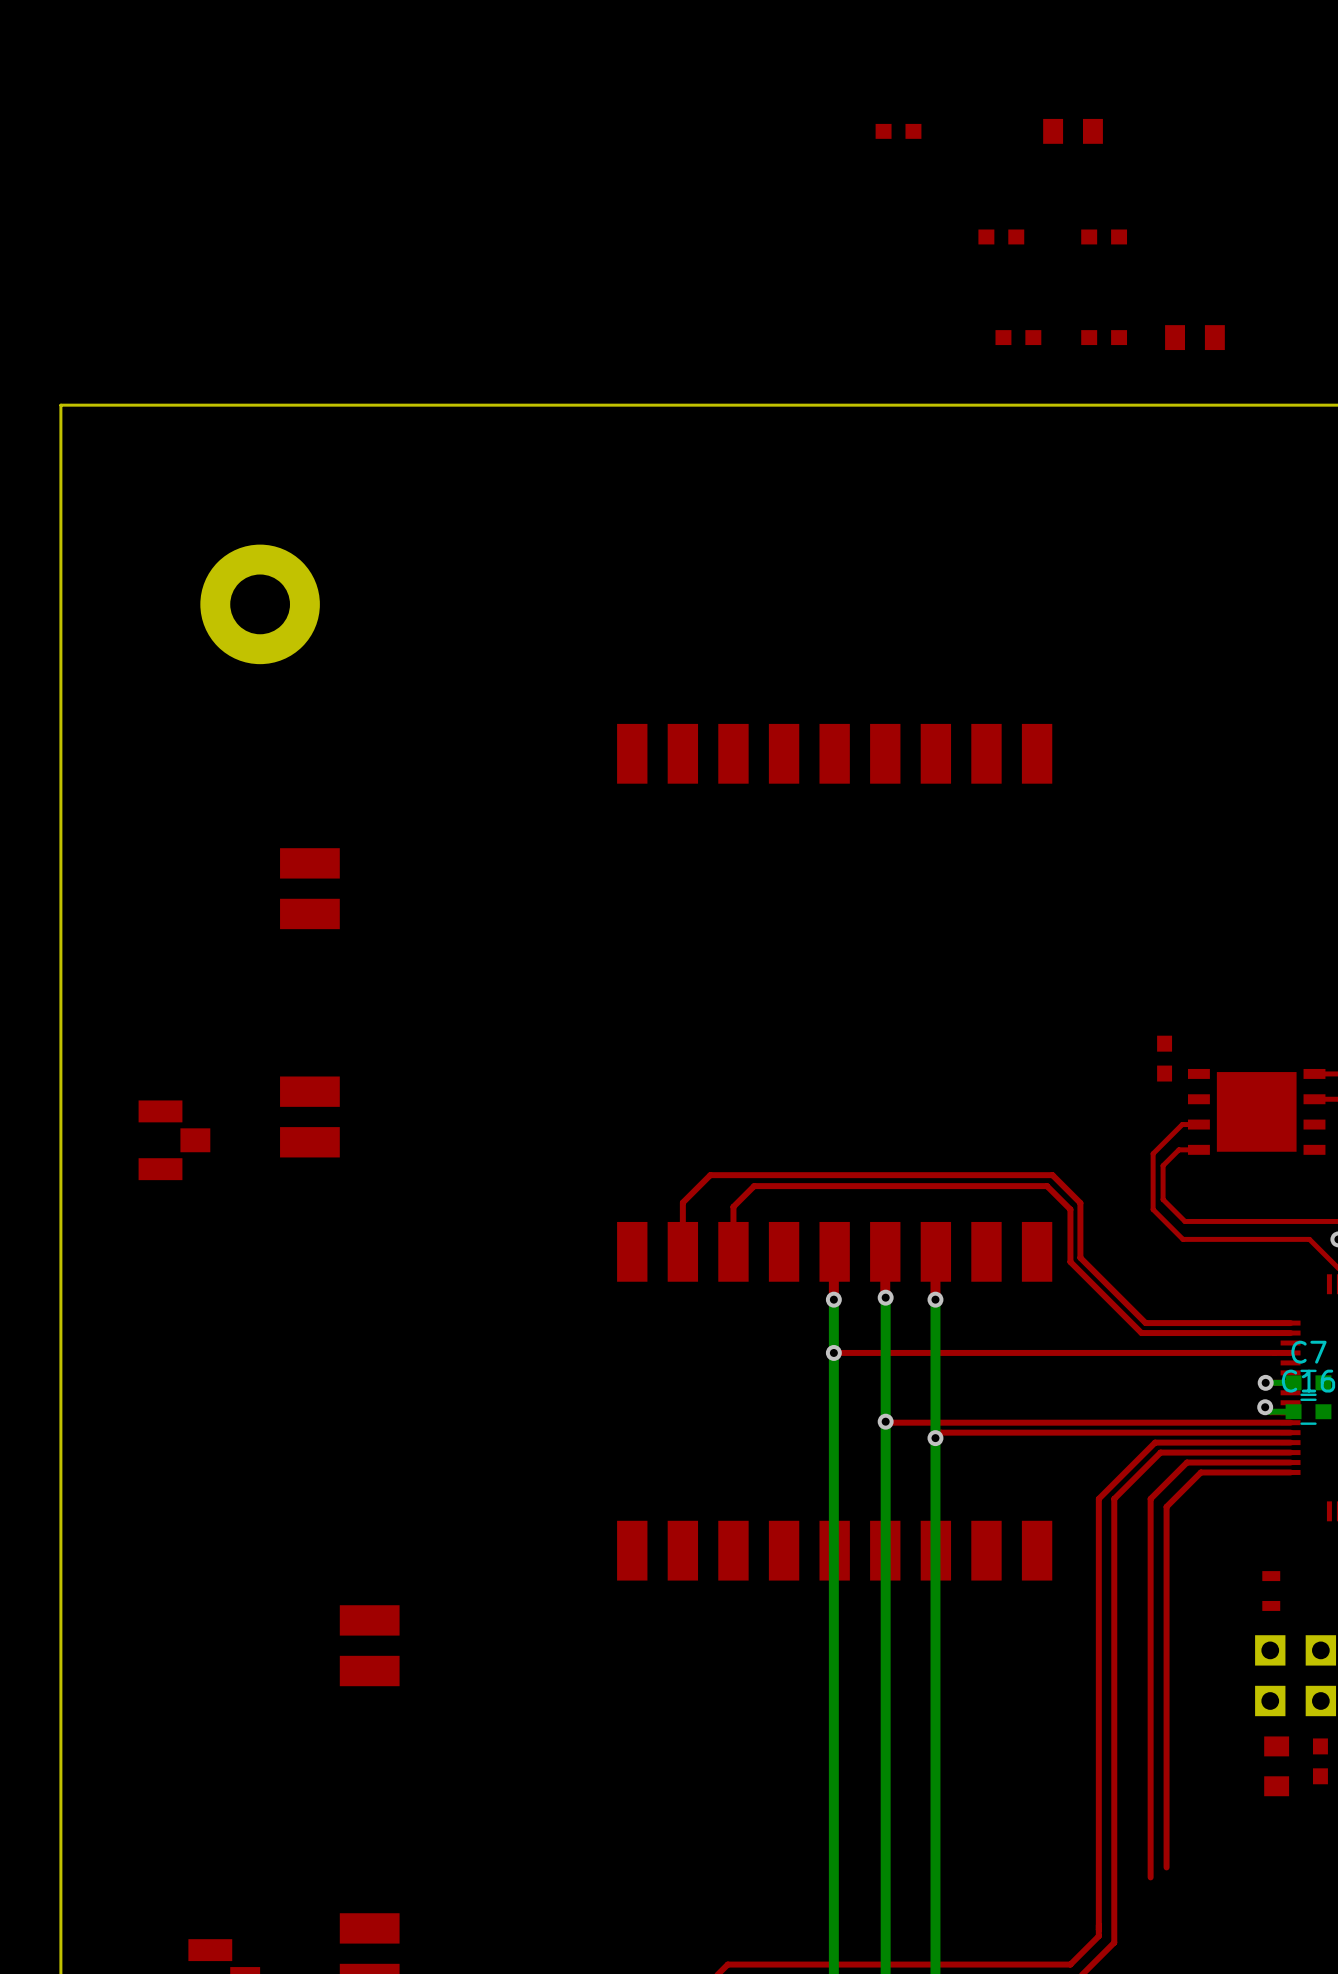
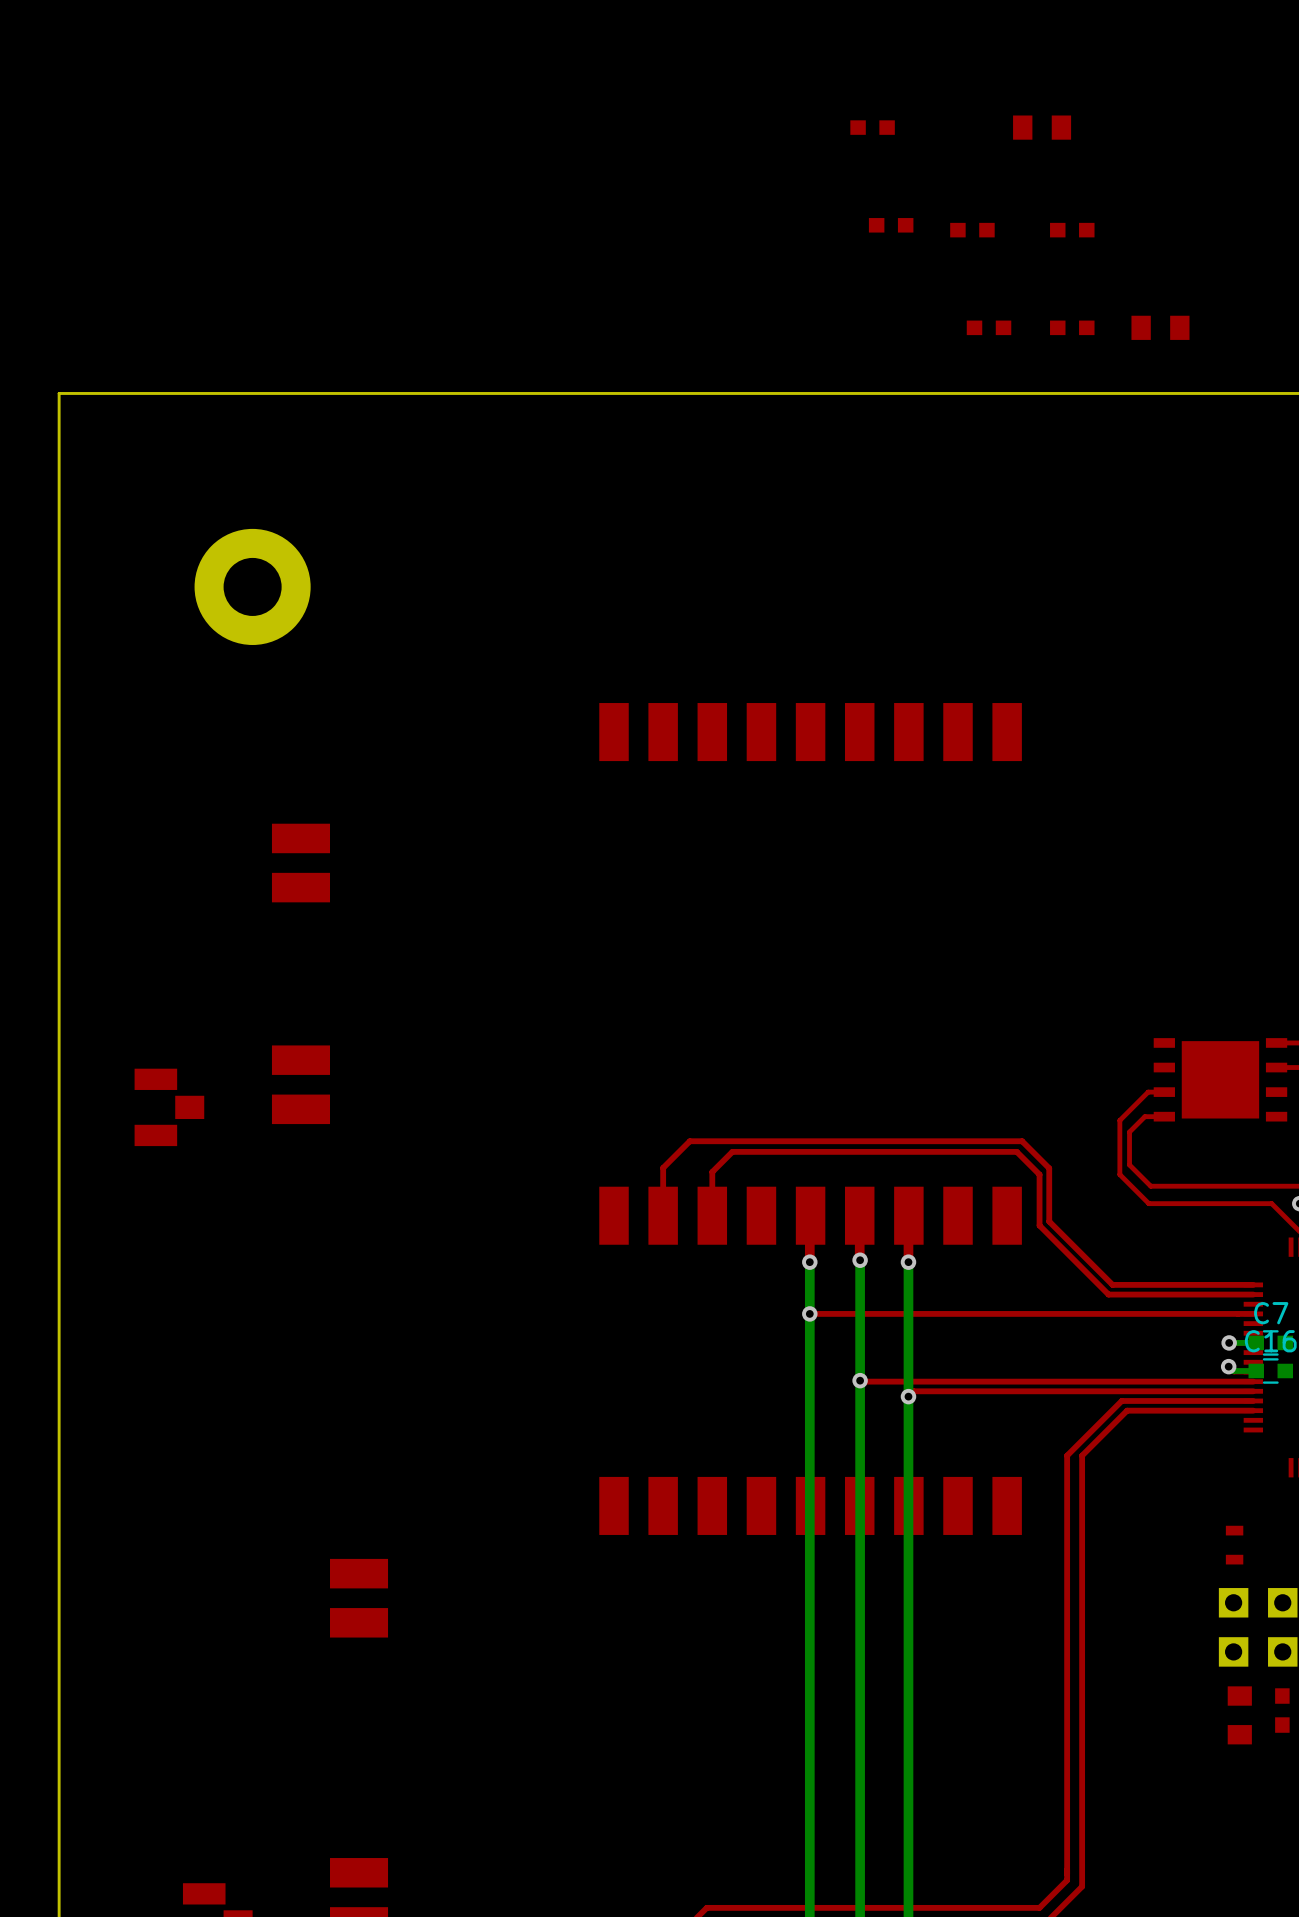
part: none -> (891, 225)
part: (1164, 1058) -> none
top track: (1290, 1462) (1186, 1462) (1150, 1498) (1150, 1877) -> none
top track: (1290, 1472) (1200, 1472) (1166, 1506) (1166, 1867) -> none

